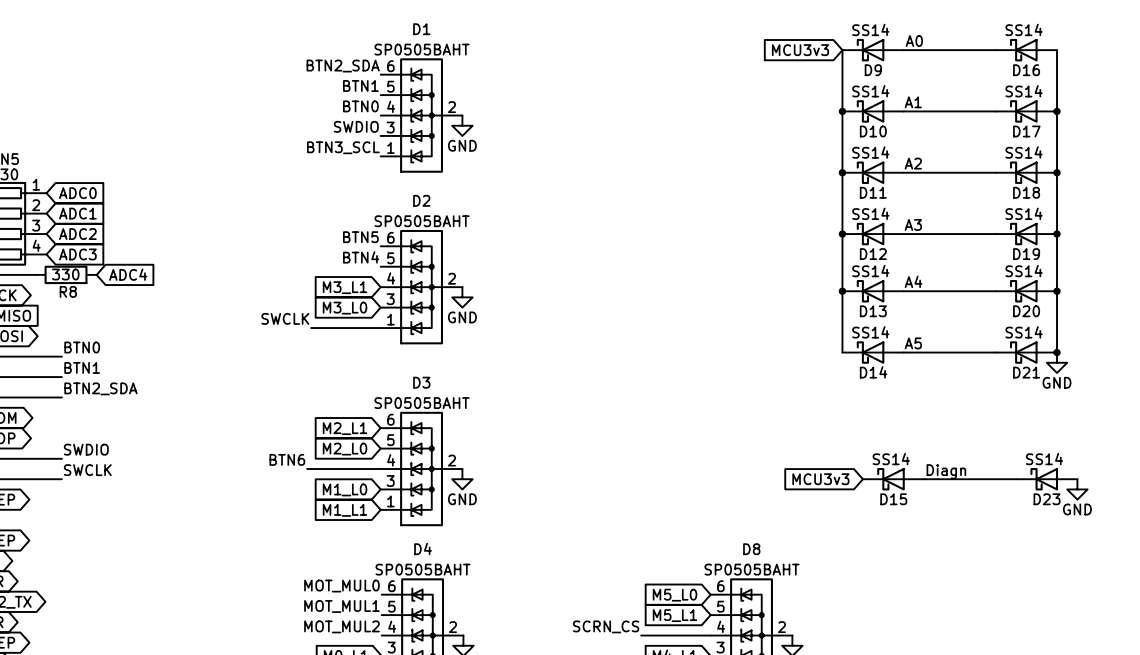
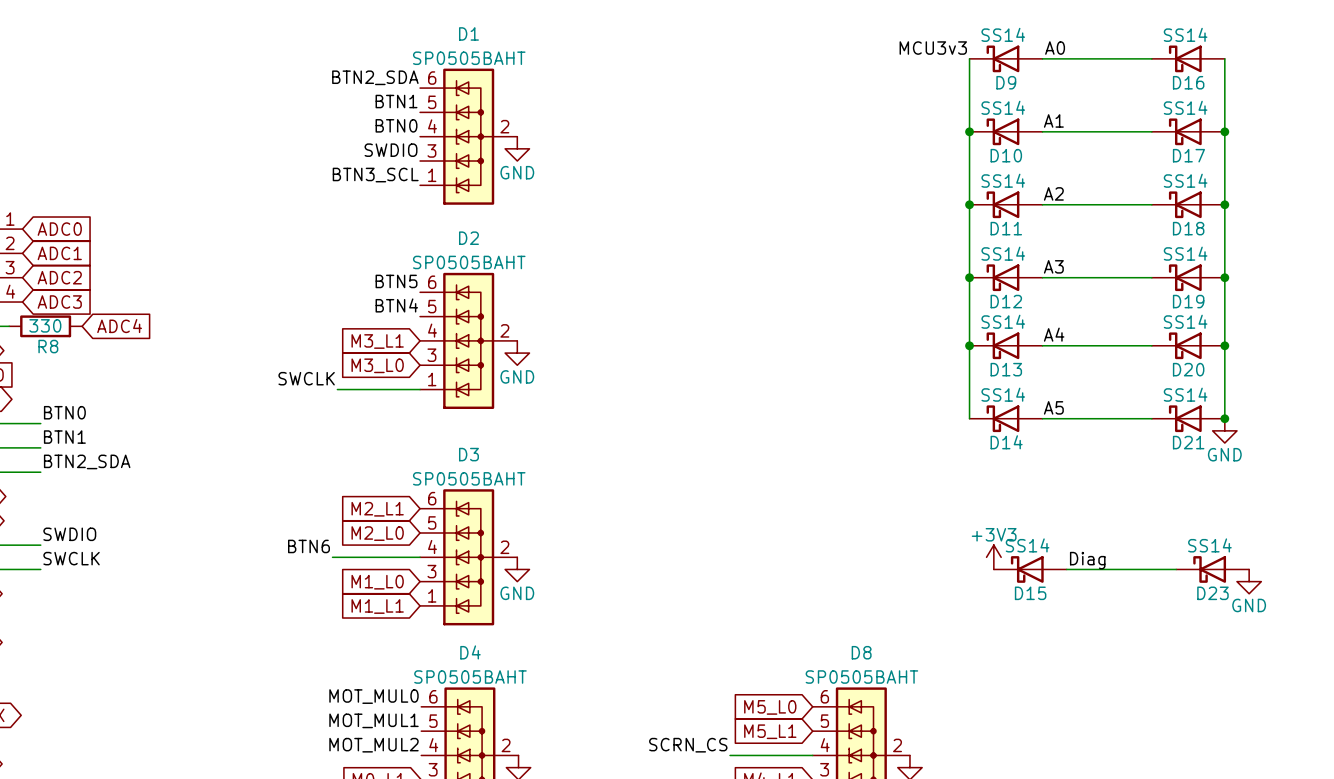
label: none -> MCU3v3 (933, 48)
global label: MCU3v3 (800, 50) -> none
power symbol: none -> +3V3 (993, 557)
label: Diagn (946, 471) -> Diag (1087, 560)
global label: MCU3v3 (820, 479) -> none

